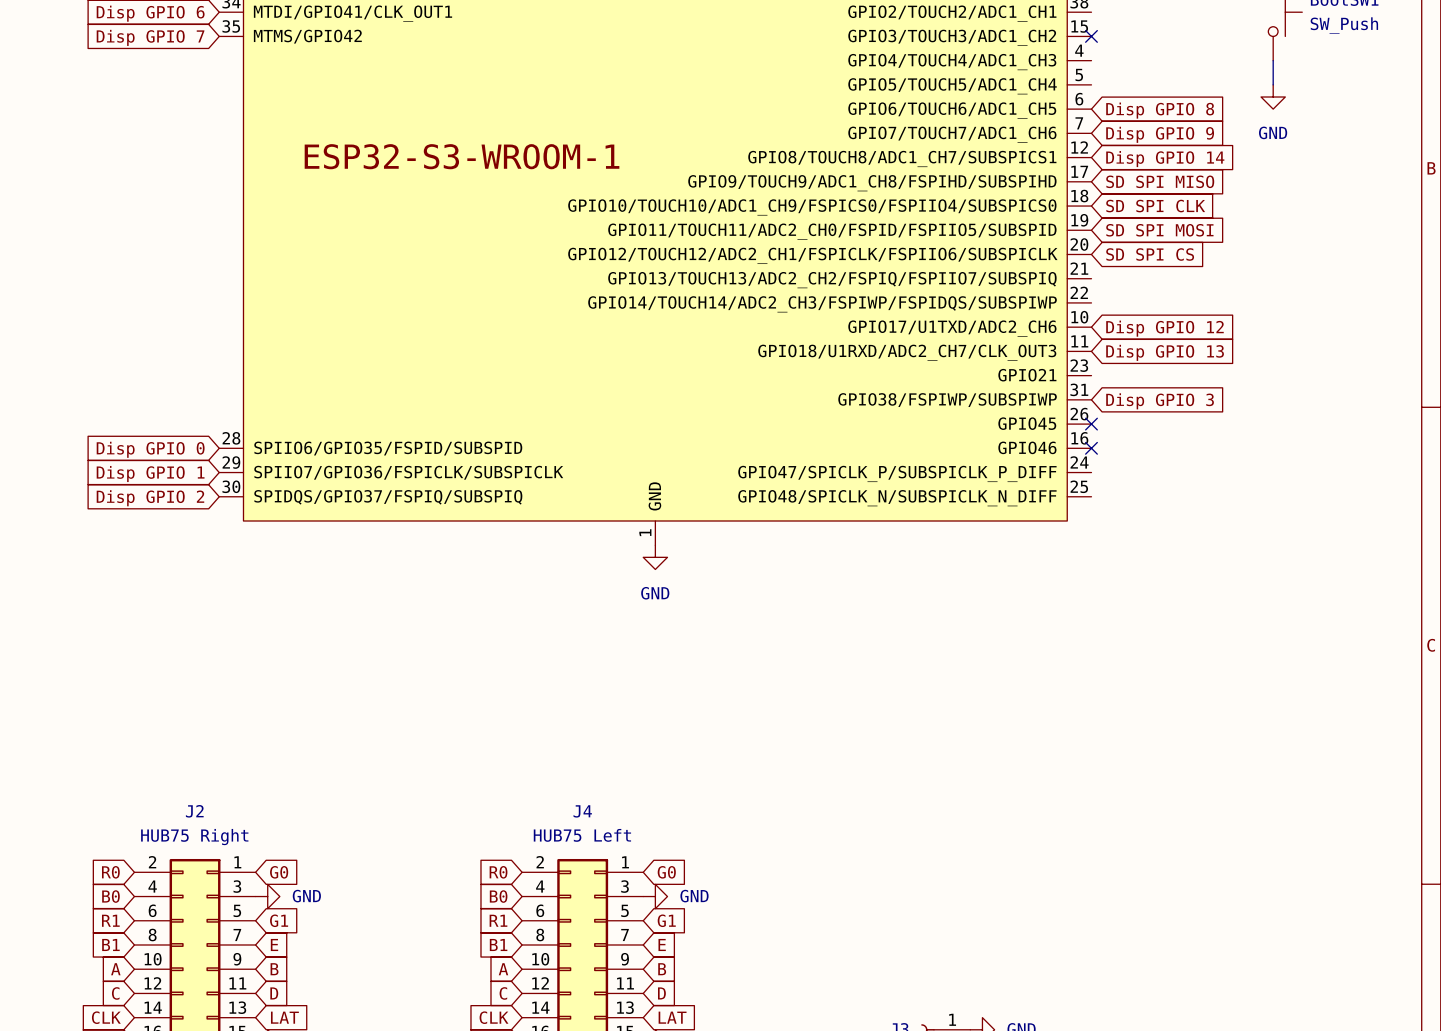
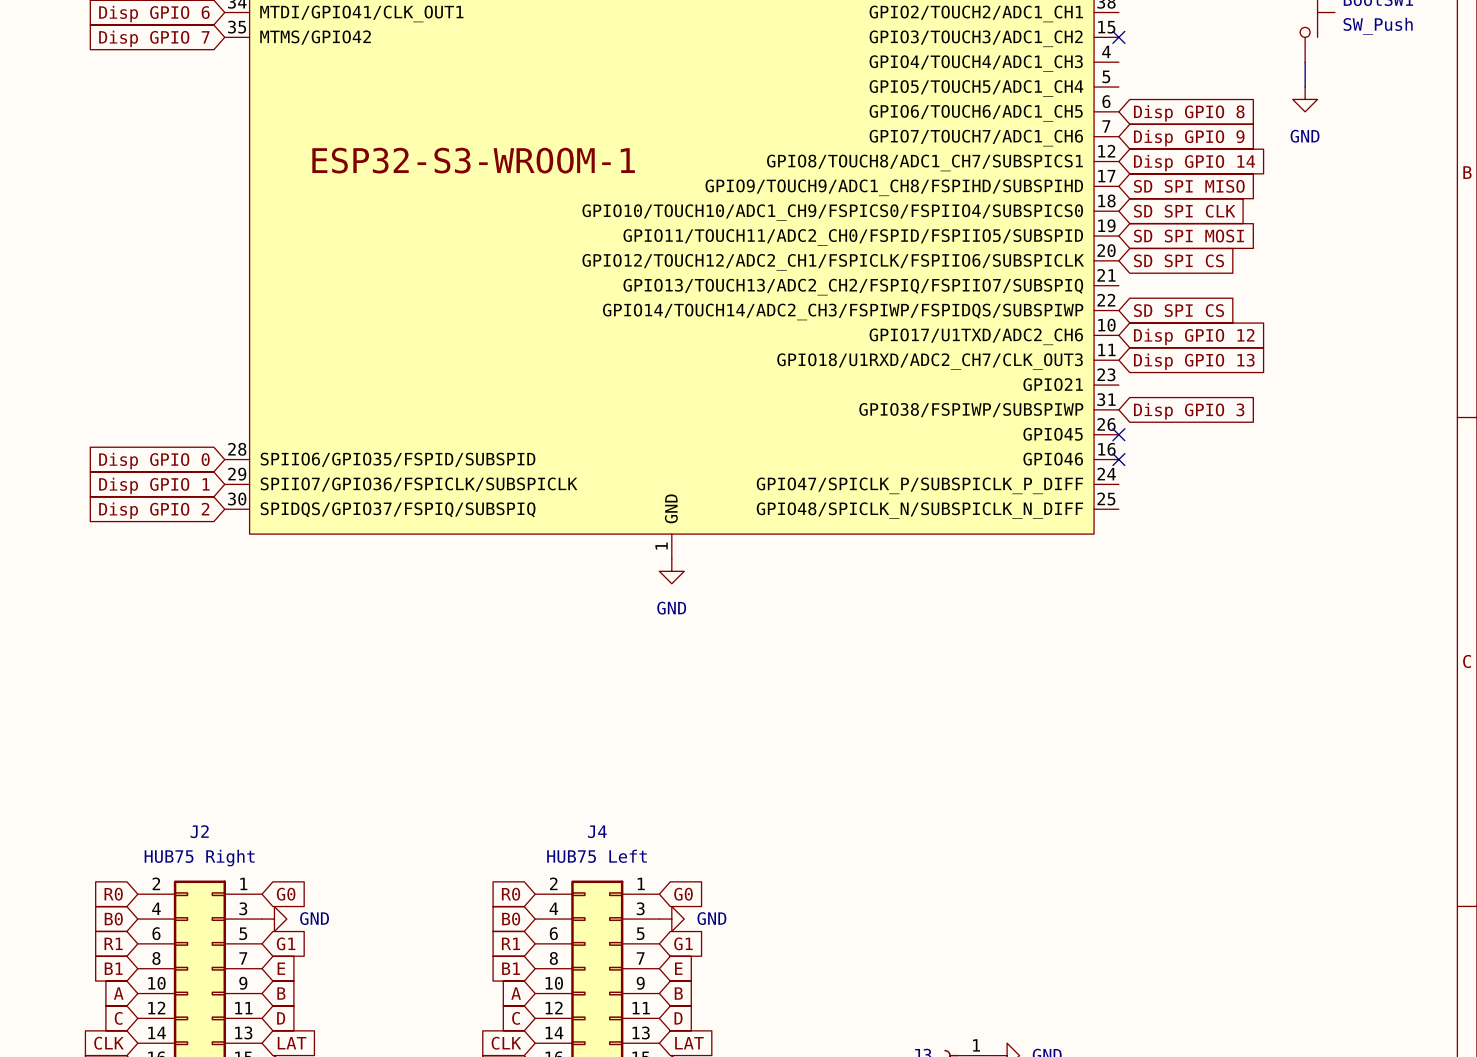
global label: none -> SD SPI CS (1179, 310)

